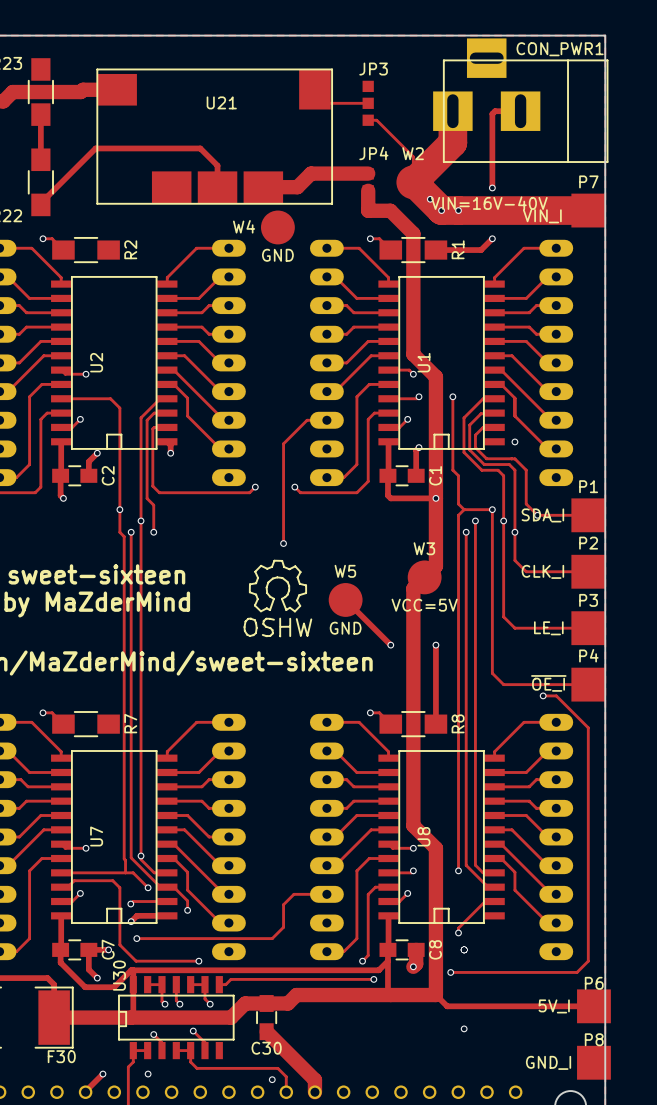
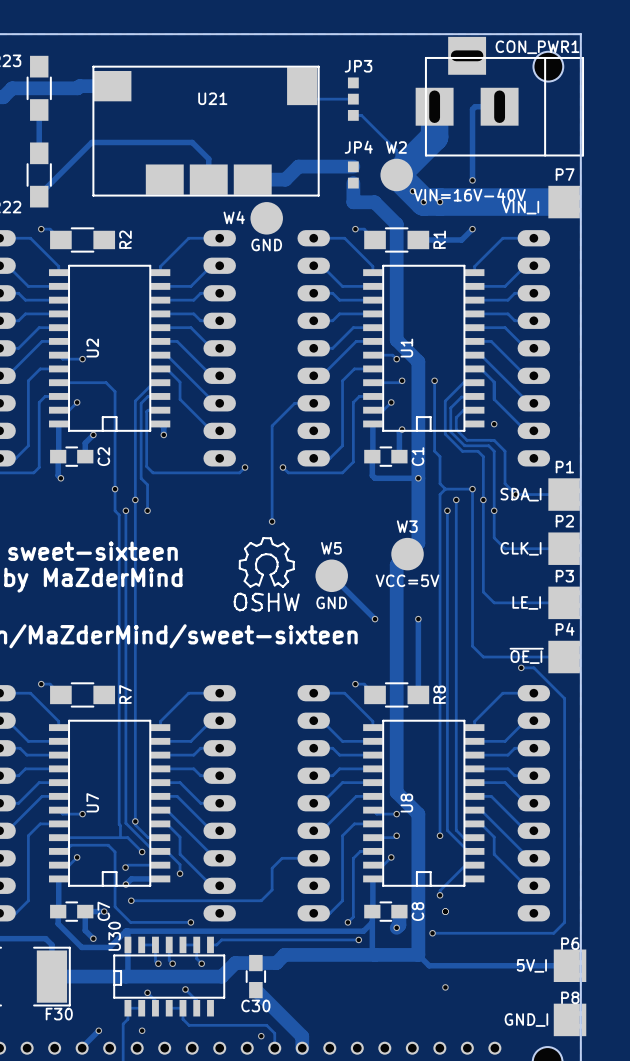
part: none -> (548, 66)

